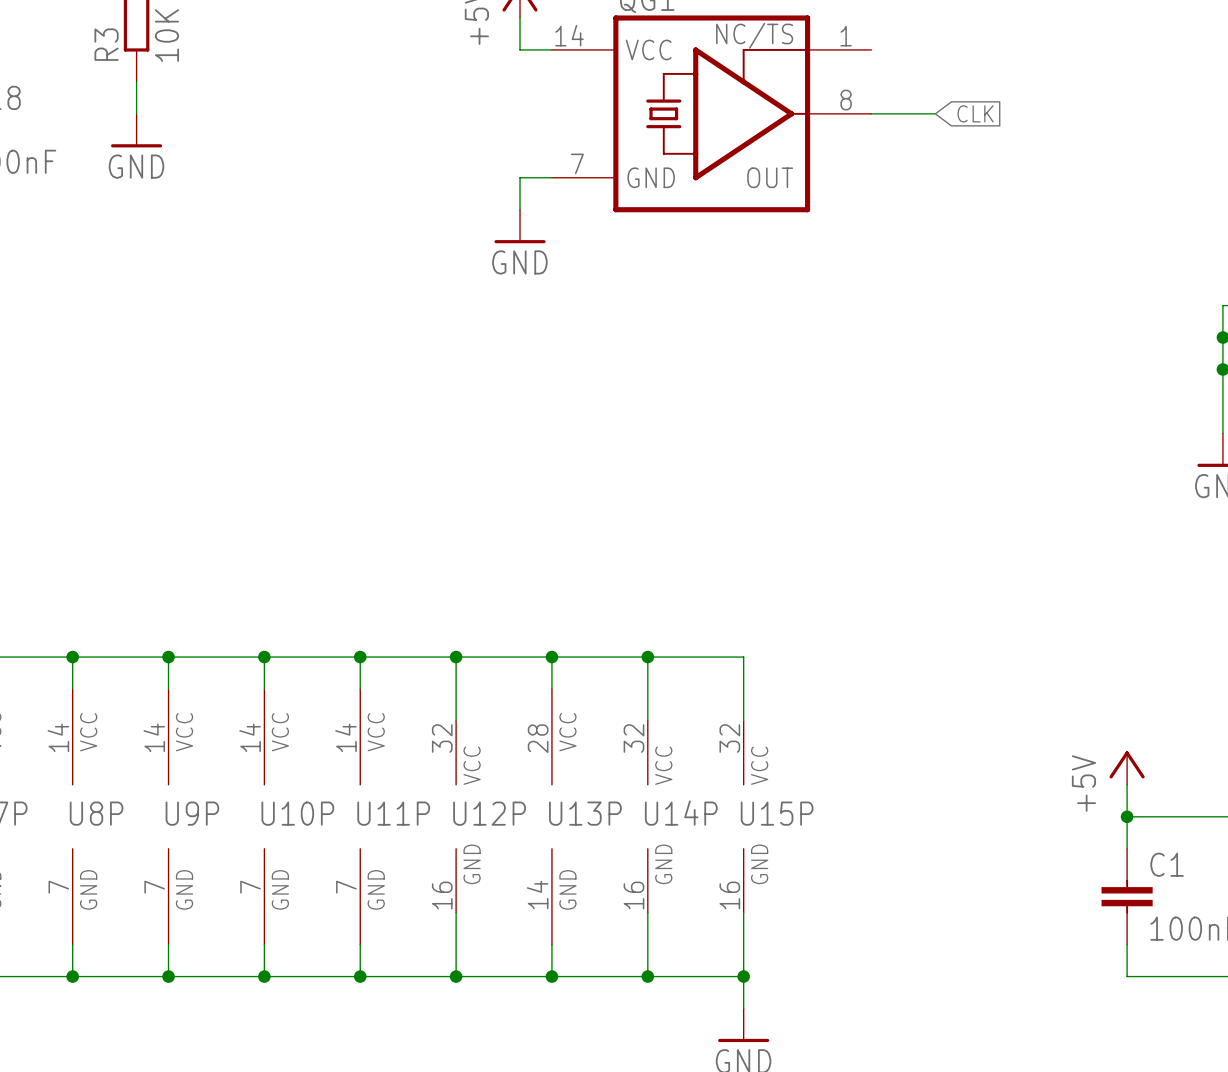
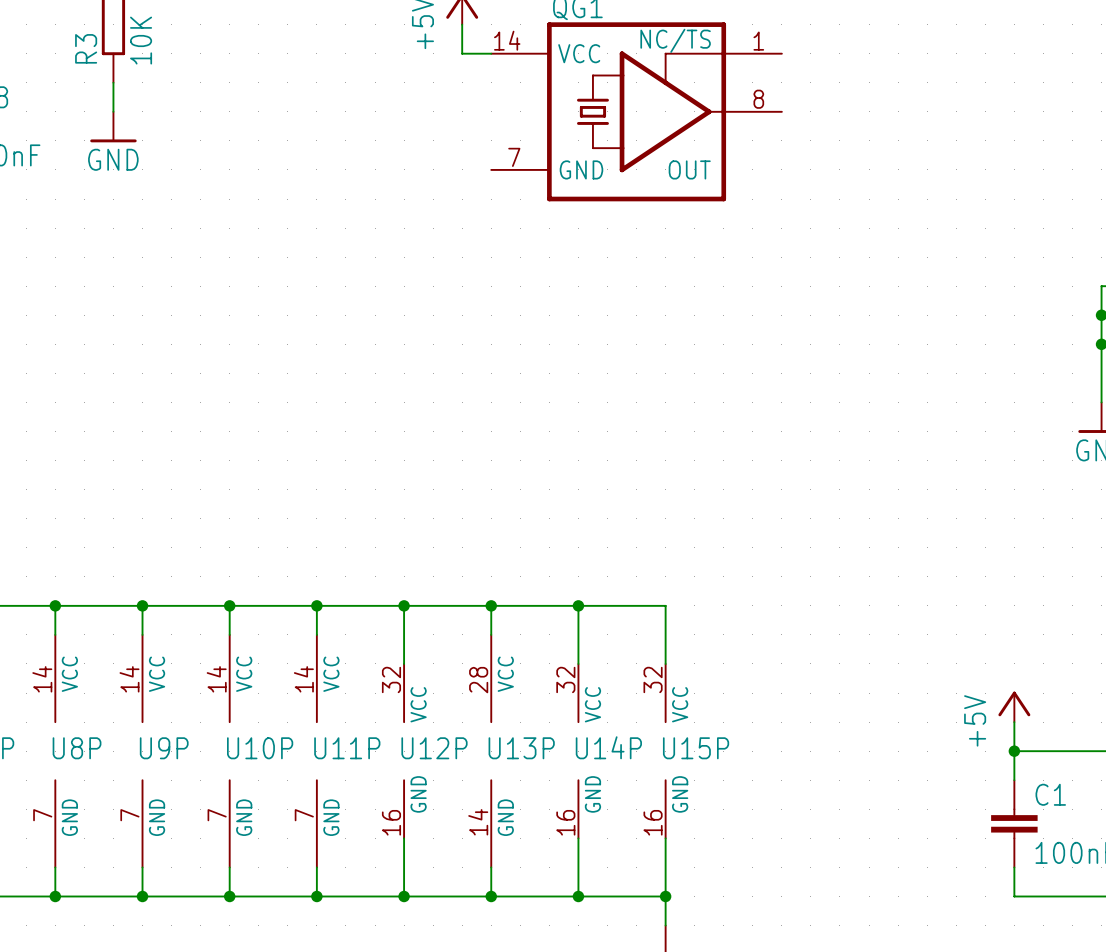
wire: (871, 113) (935, 113) -> none
global label: CLK (975, 113) -> none
wire: (551, 177) (520, 177) (520, 209) -> none
power symbol: GND (520, 226) -> none

